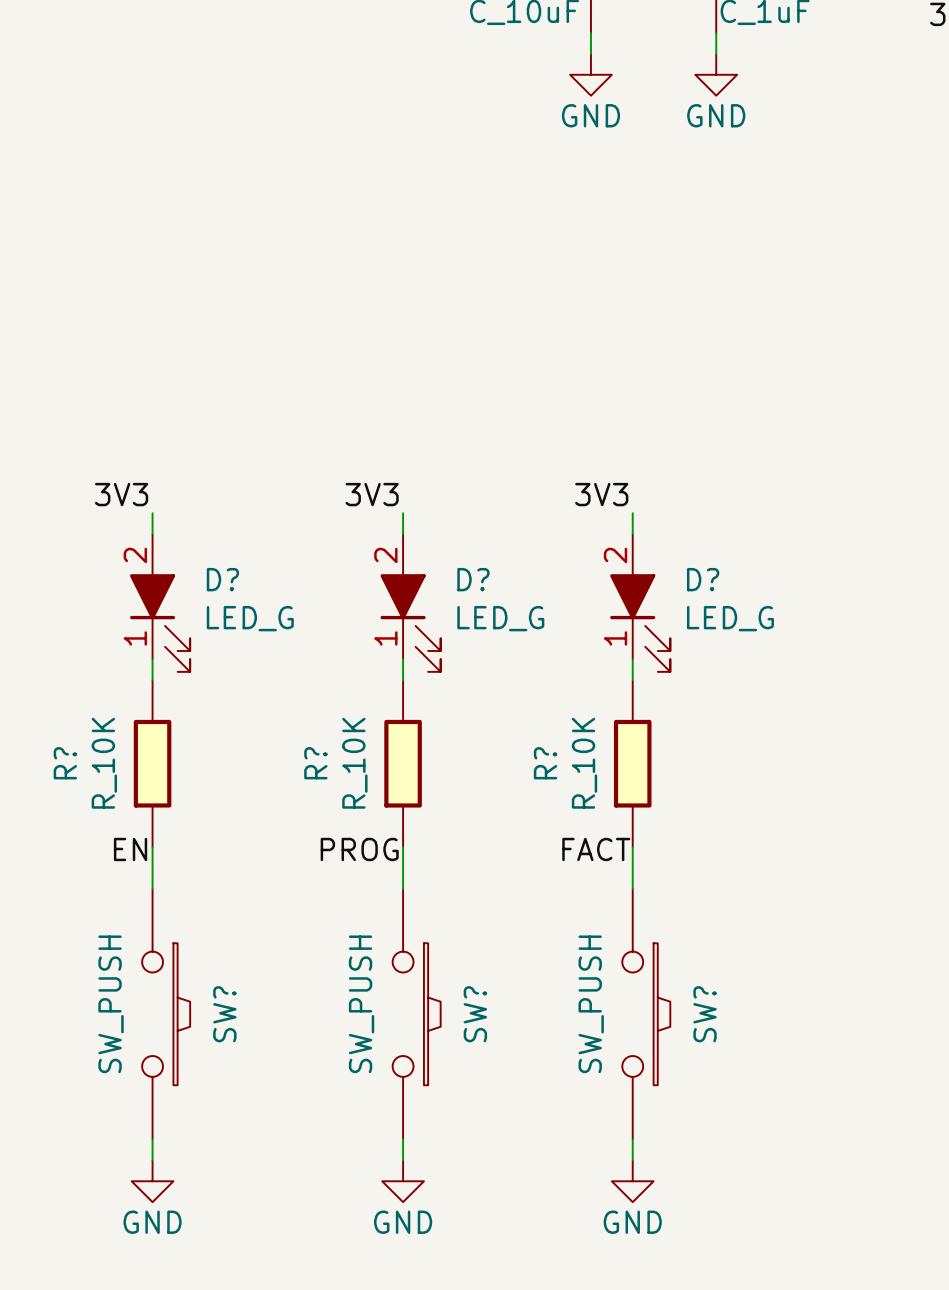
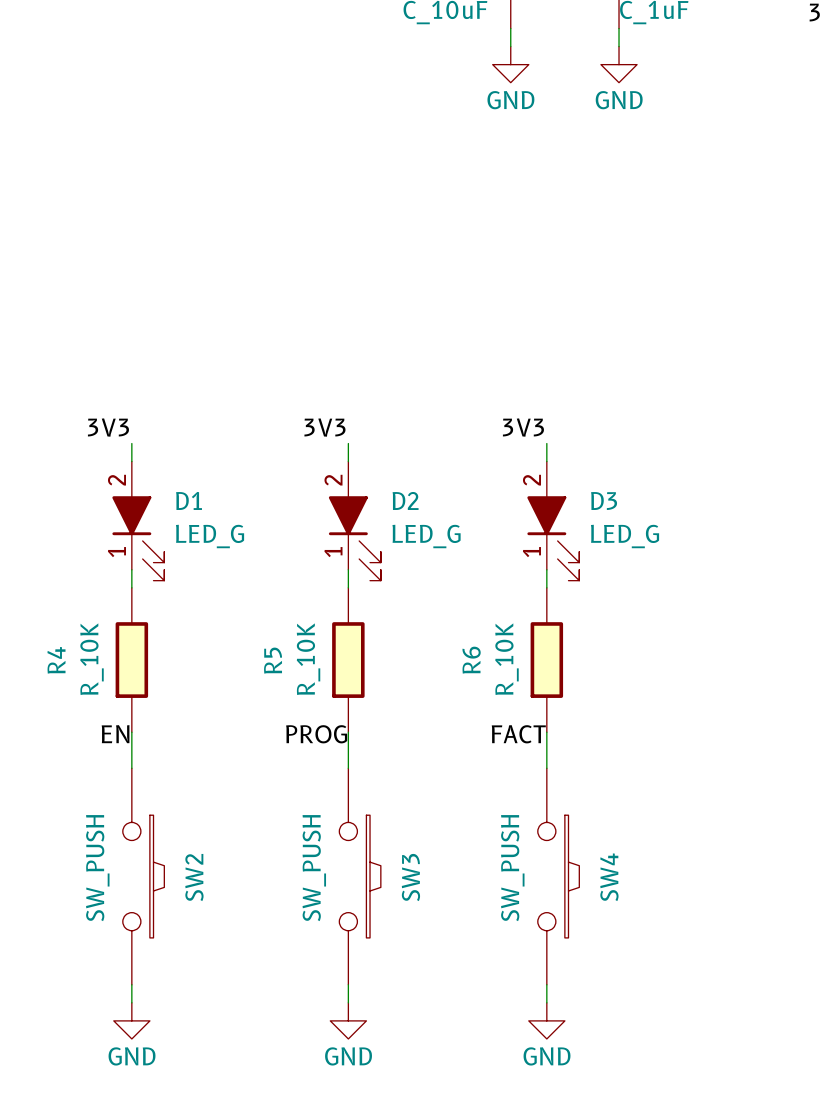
D? name: D? (222, 579) -> D1 (189, 500)
D? name: D? (473, 579) -> D2 (405, 500)
D? name: D? (703, 579) -> D3 (604, 501)
R? name: R? (65, 763) -> R4 (56, 660)
R? name: R? (315, 763) -> R5 (273, 660)
R? name: R? (545, 763) -> R6 (471, 660)
SW? name: SW? (224, 1014) -> SW2 (194, 877)
SW? name: SW? (475, 1014) -> SW3 (410, 877)
SW? name: SW? (705, 1014) -> SW4 (609, 877)

